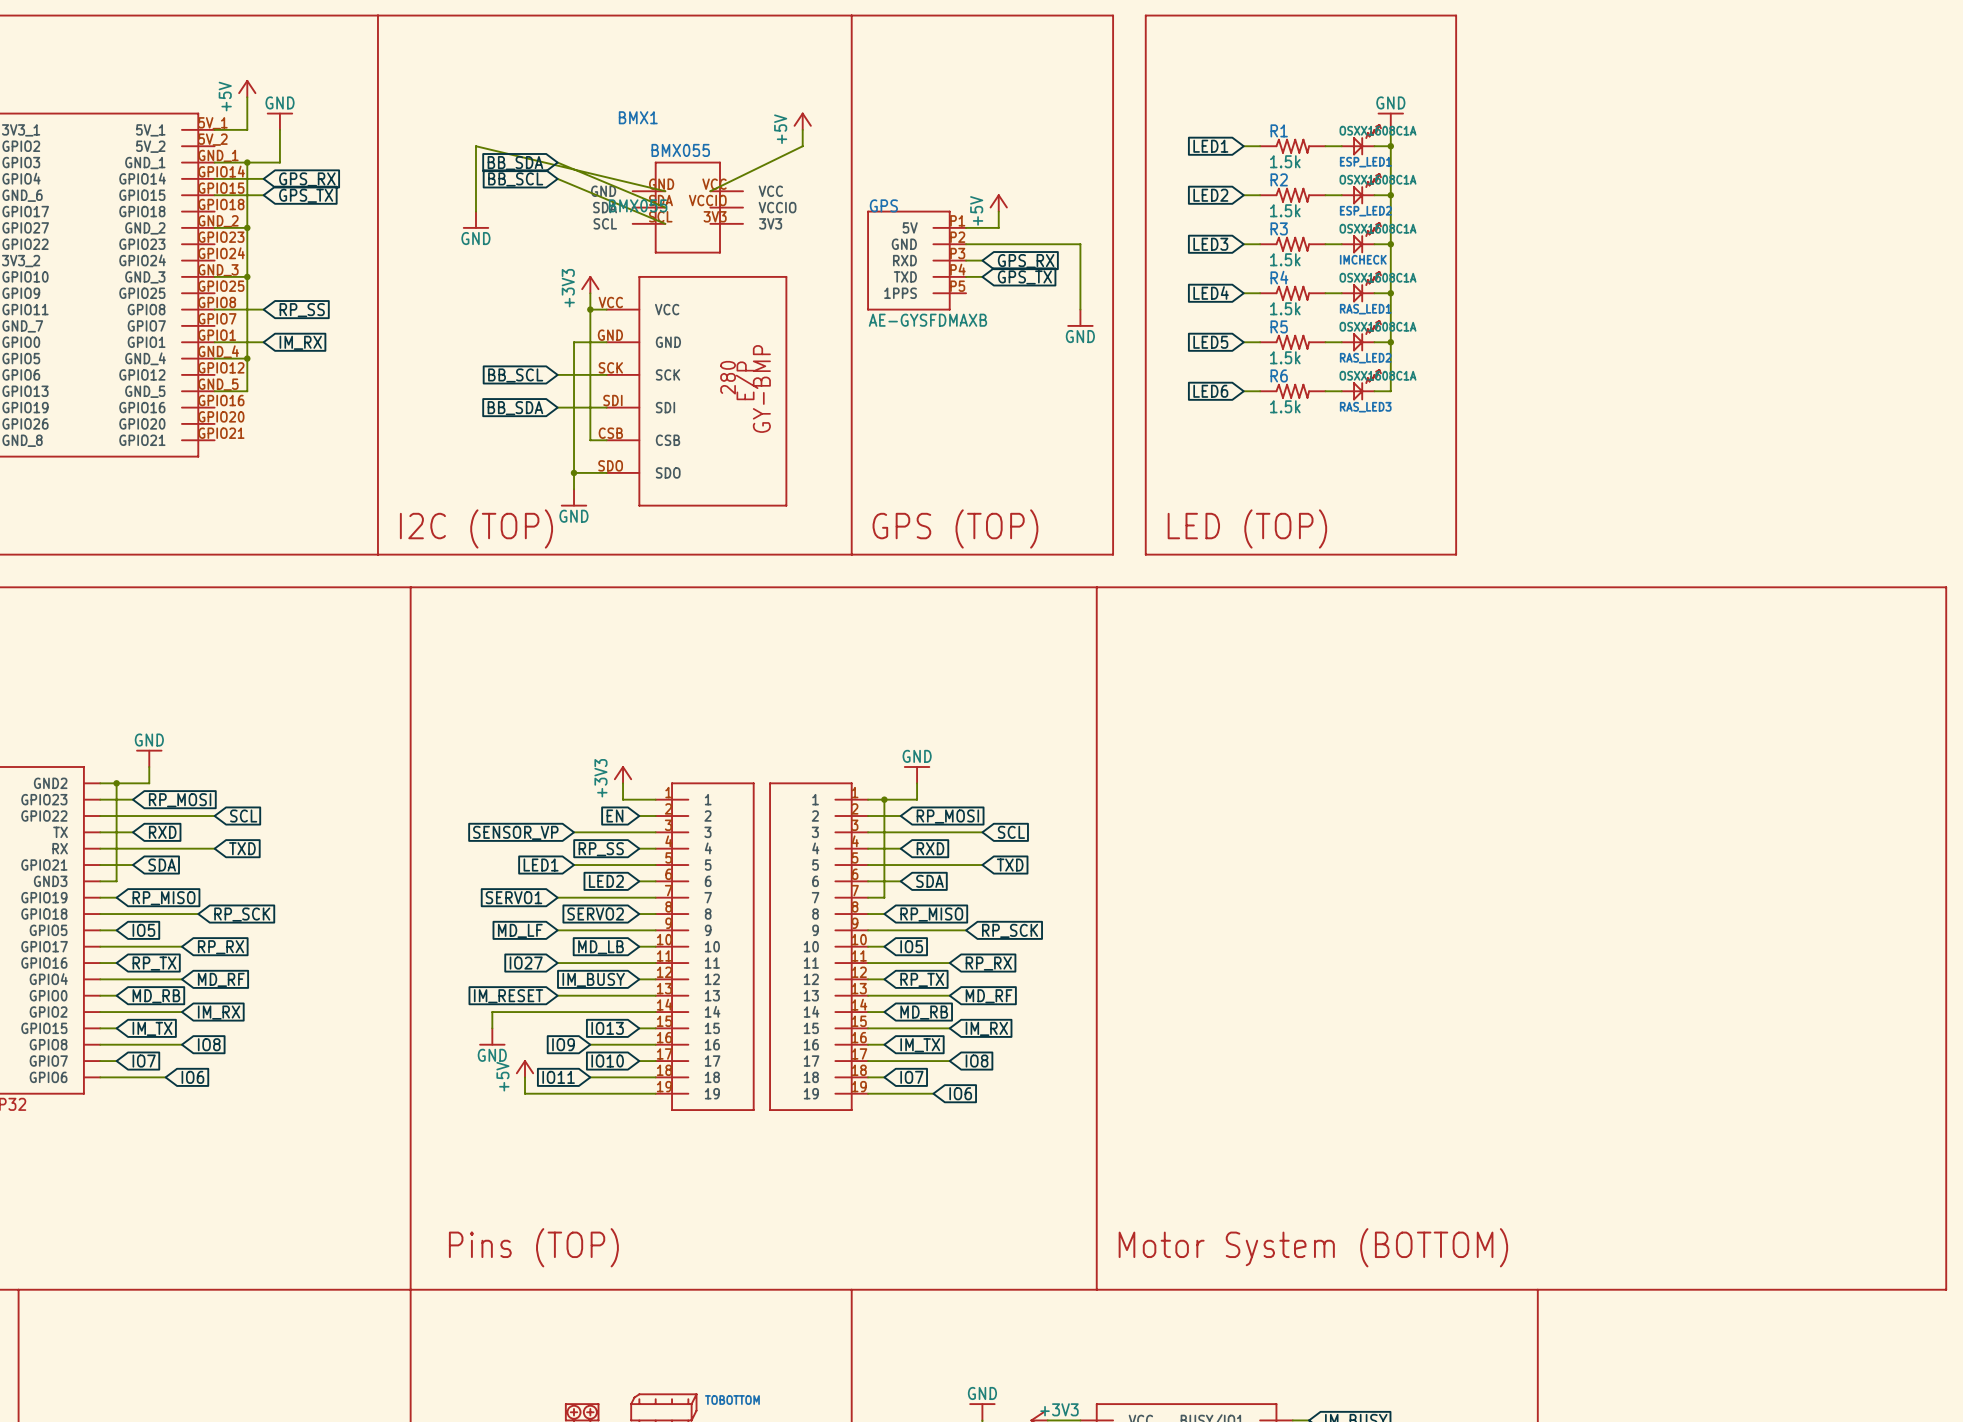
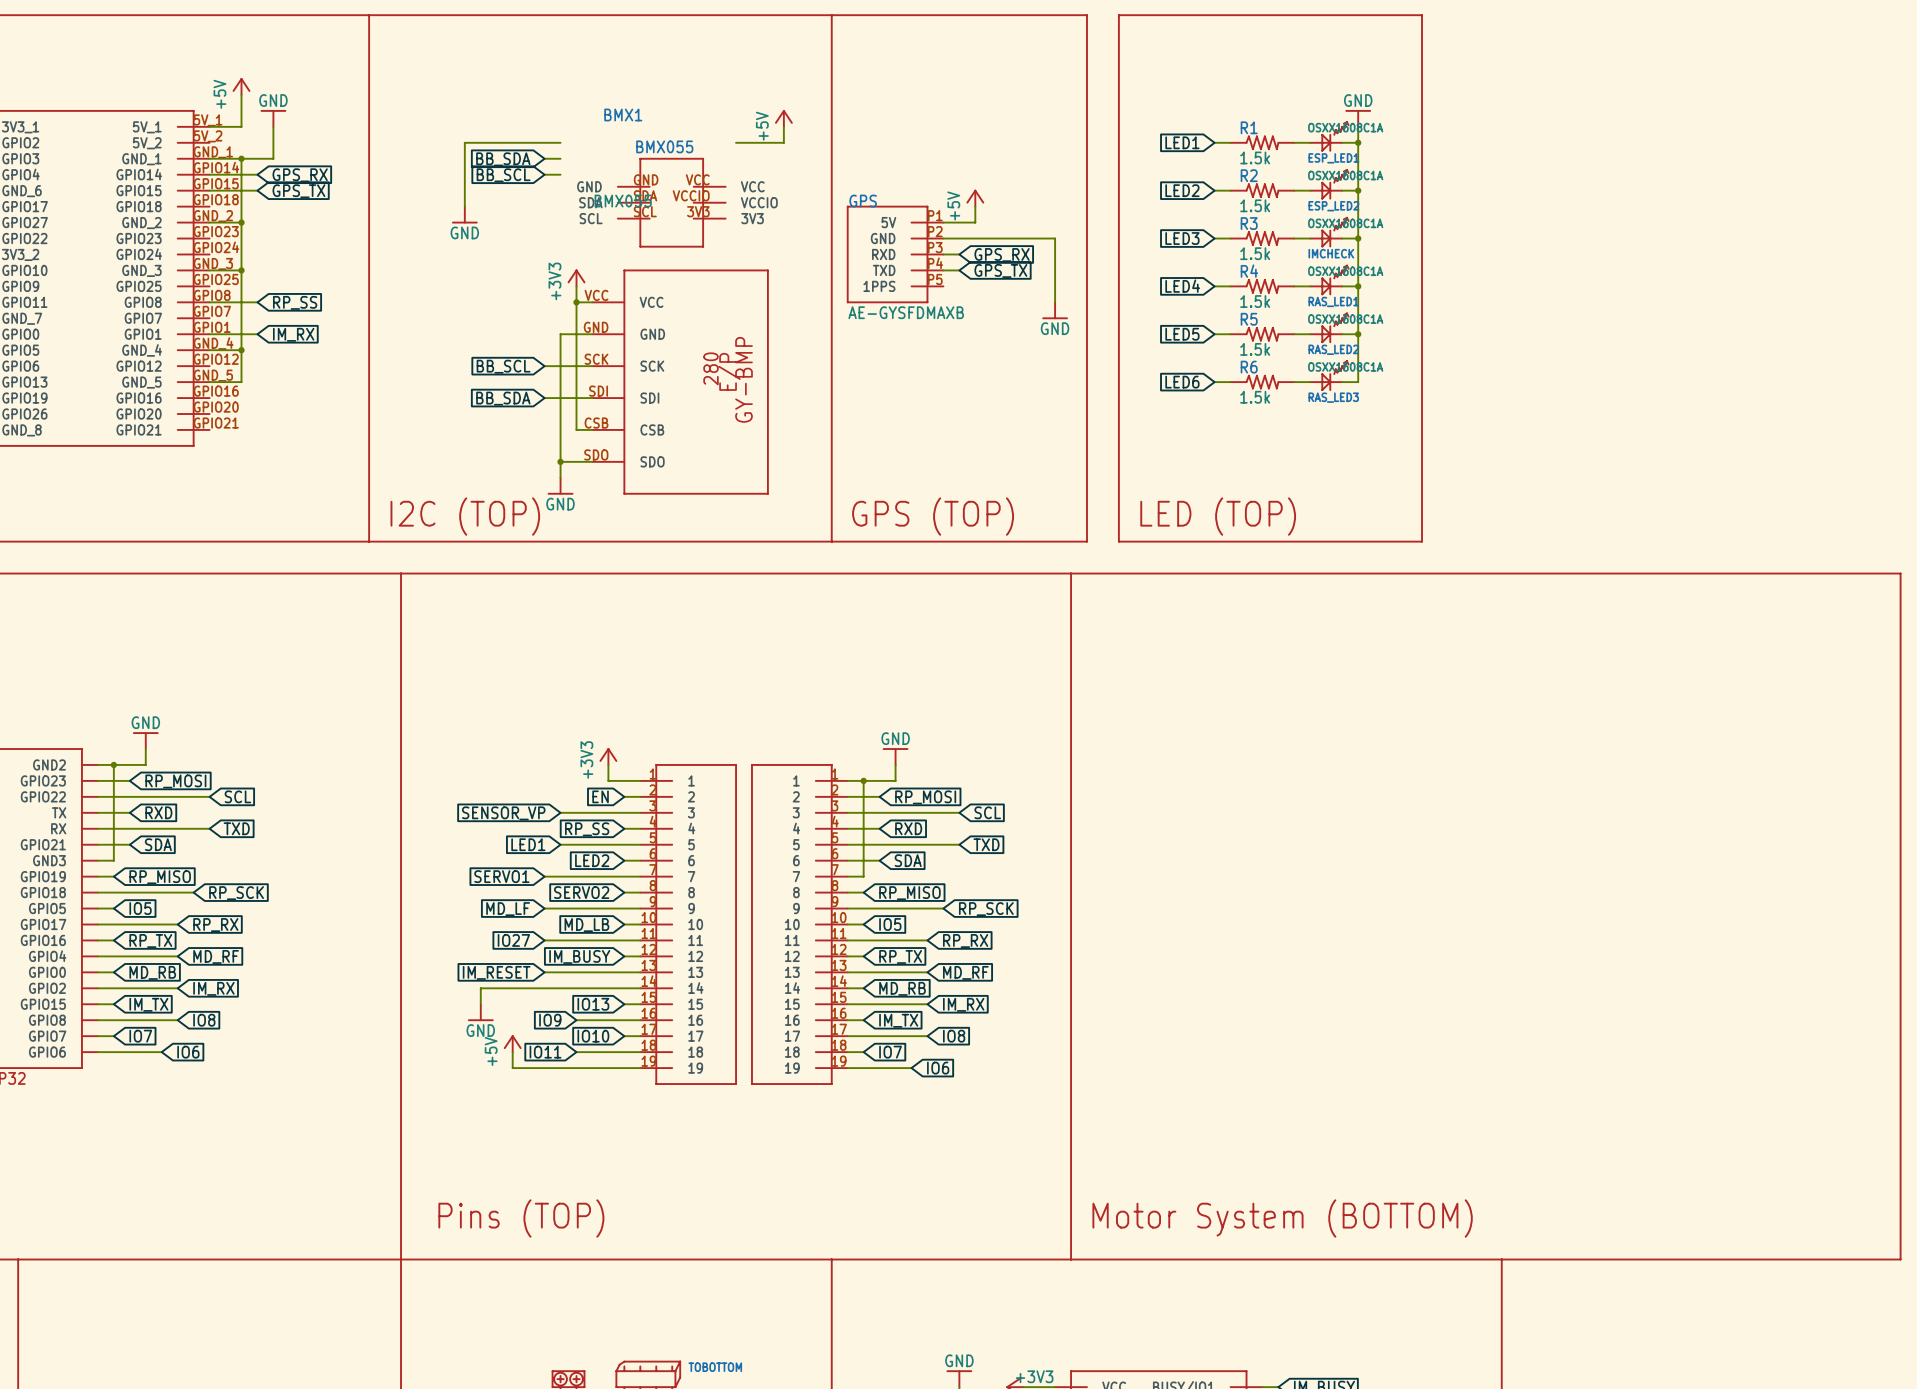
wire: (475, 146) (665, 191) -> (464, 142) (560, 142)
wire: (802, 146) (710, 191) -> (783, 142) (736, 142)
wire: (557, 162) (665, 207) -> (544, 158) (560, 158)
wire: (557, 178) (665, 223) -> (544, 174) (560, 174)

